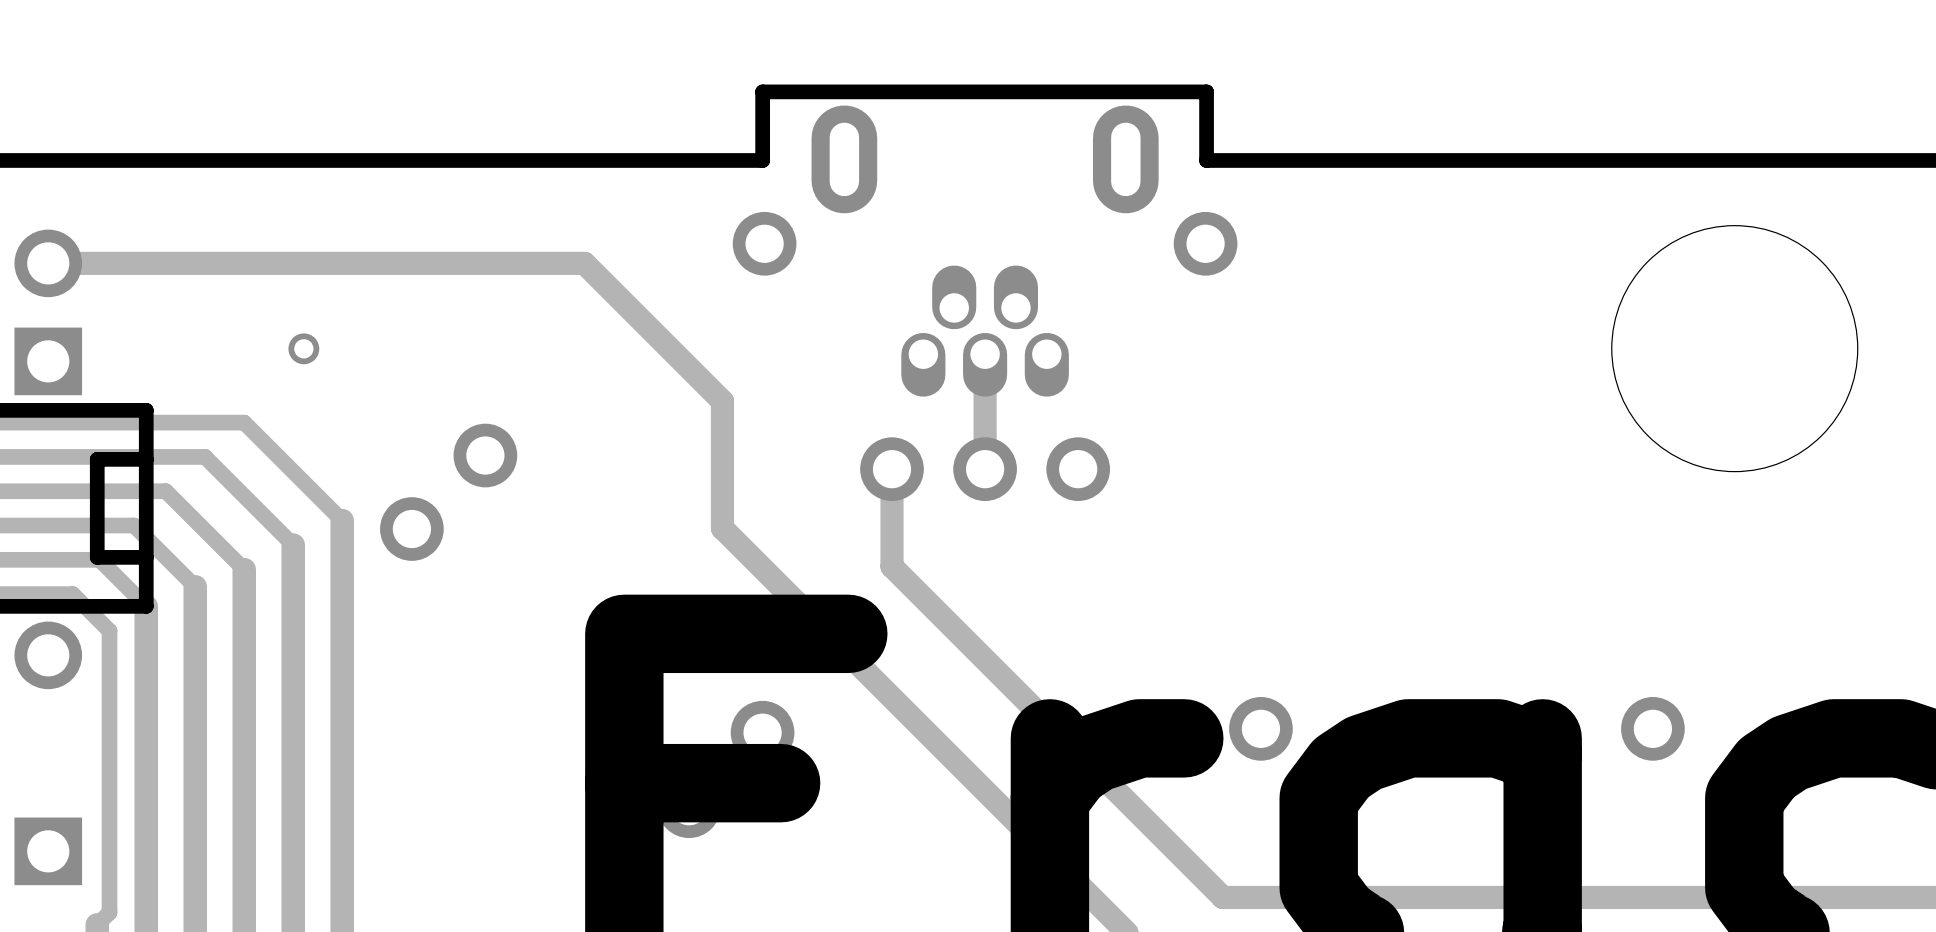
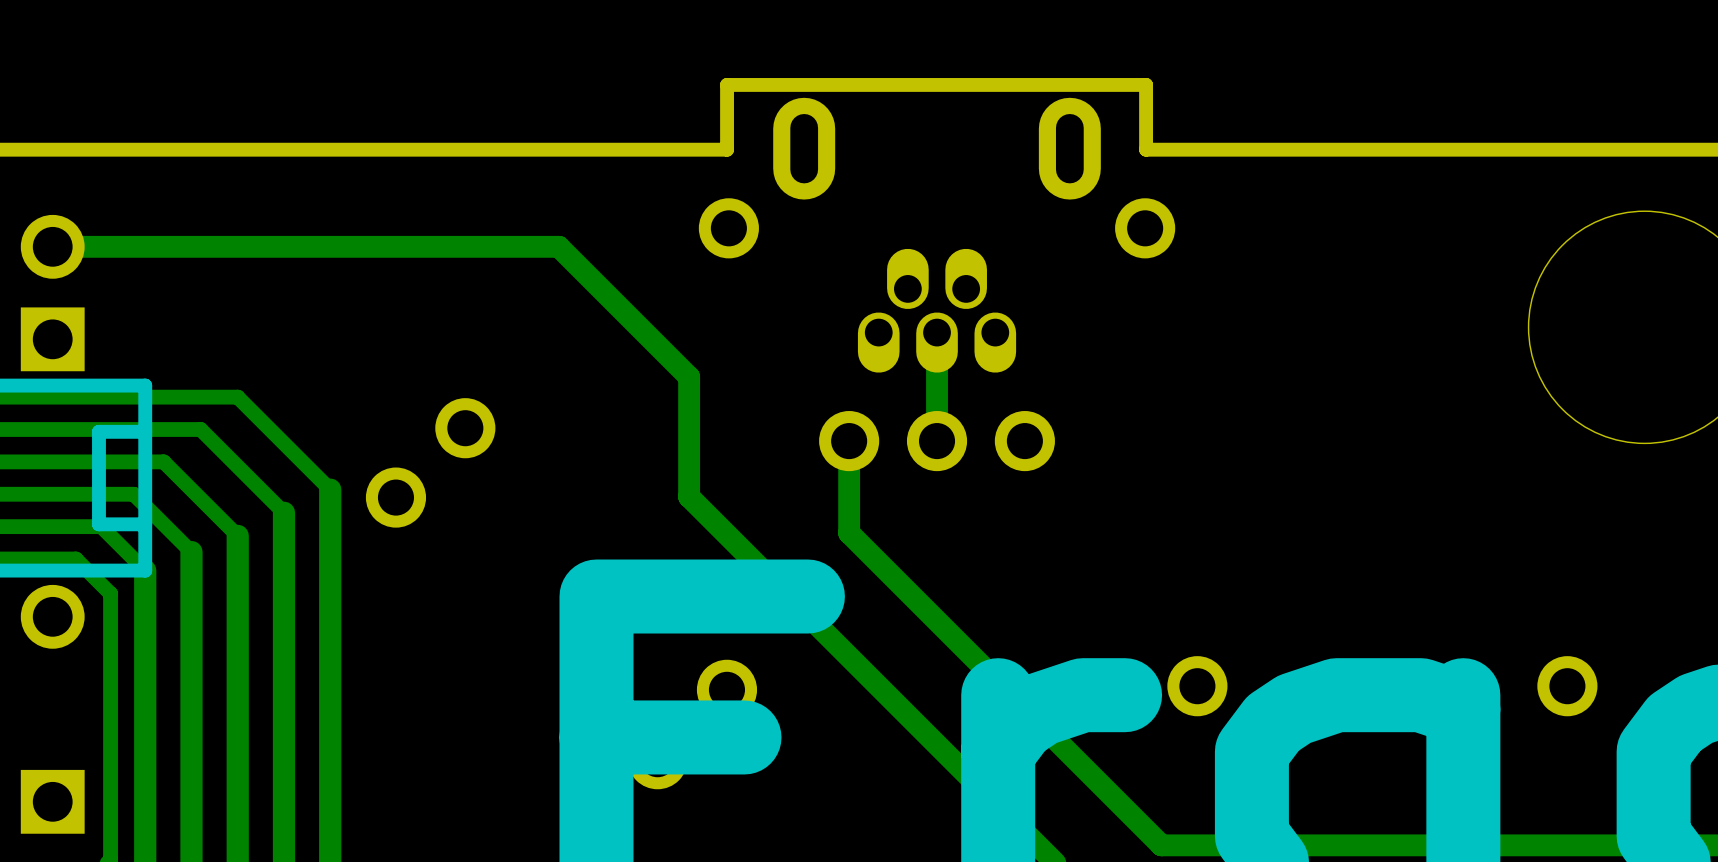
part: (303, 348) -> none

